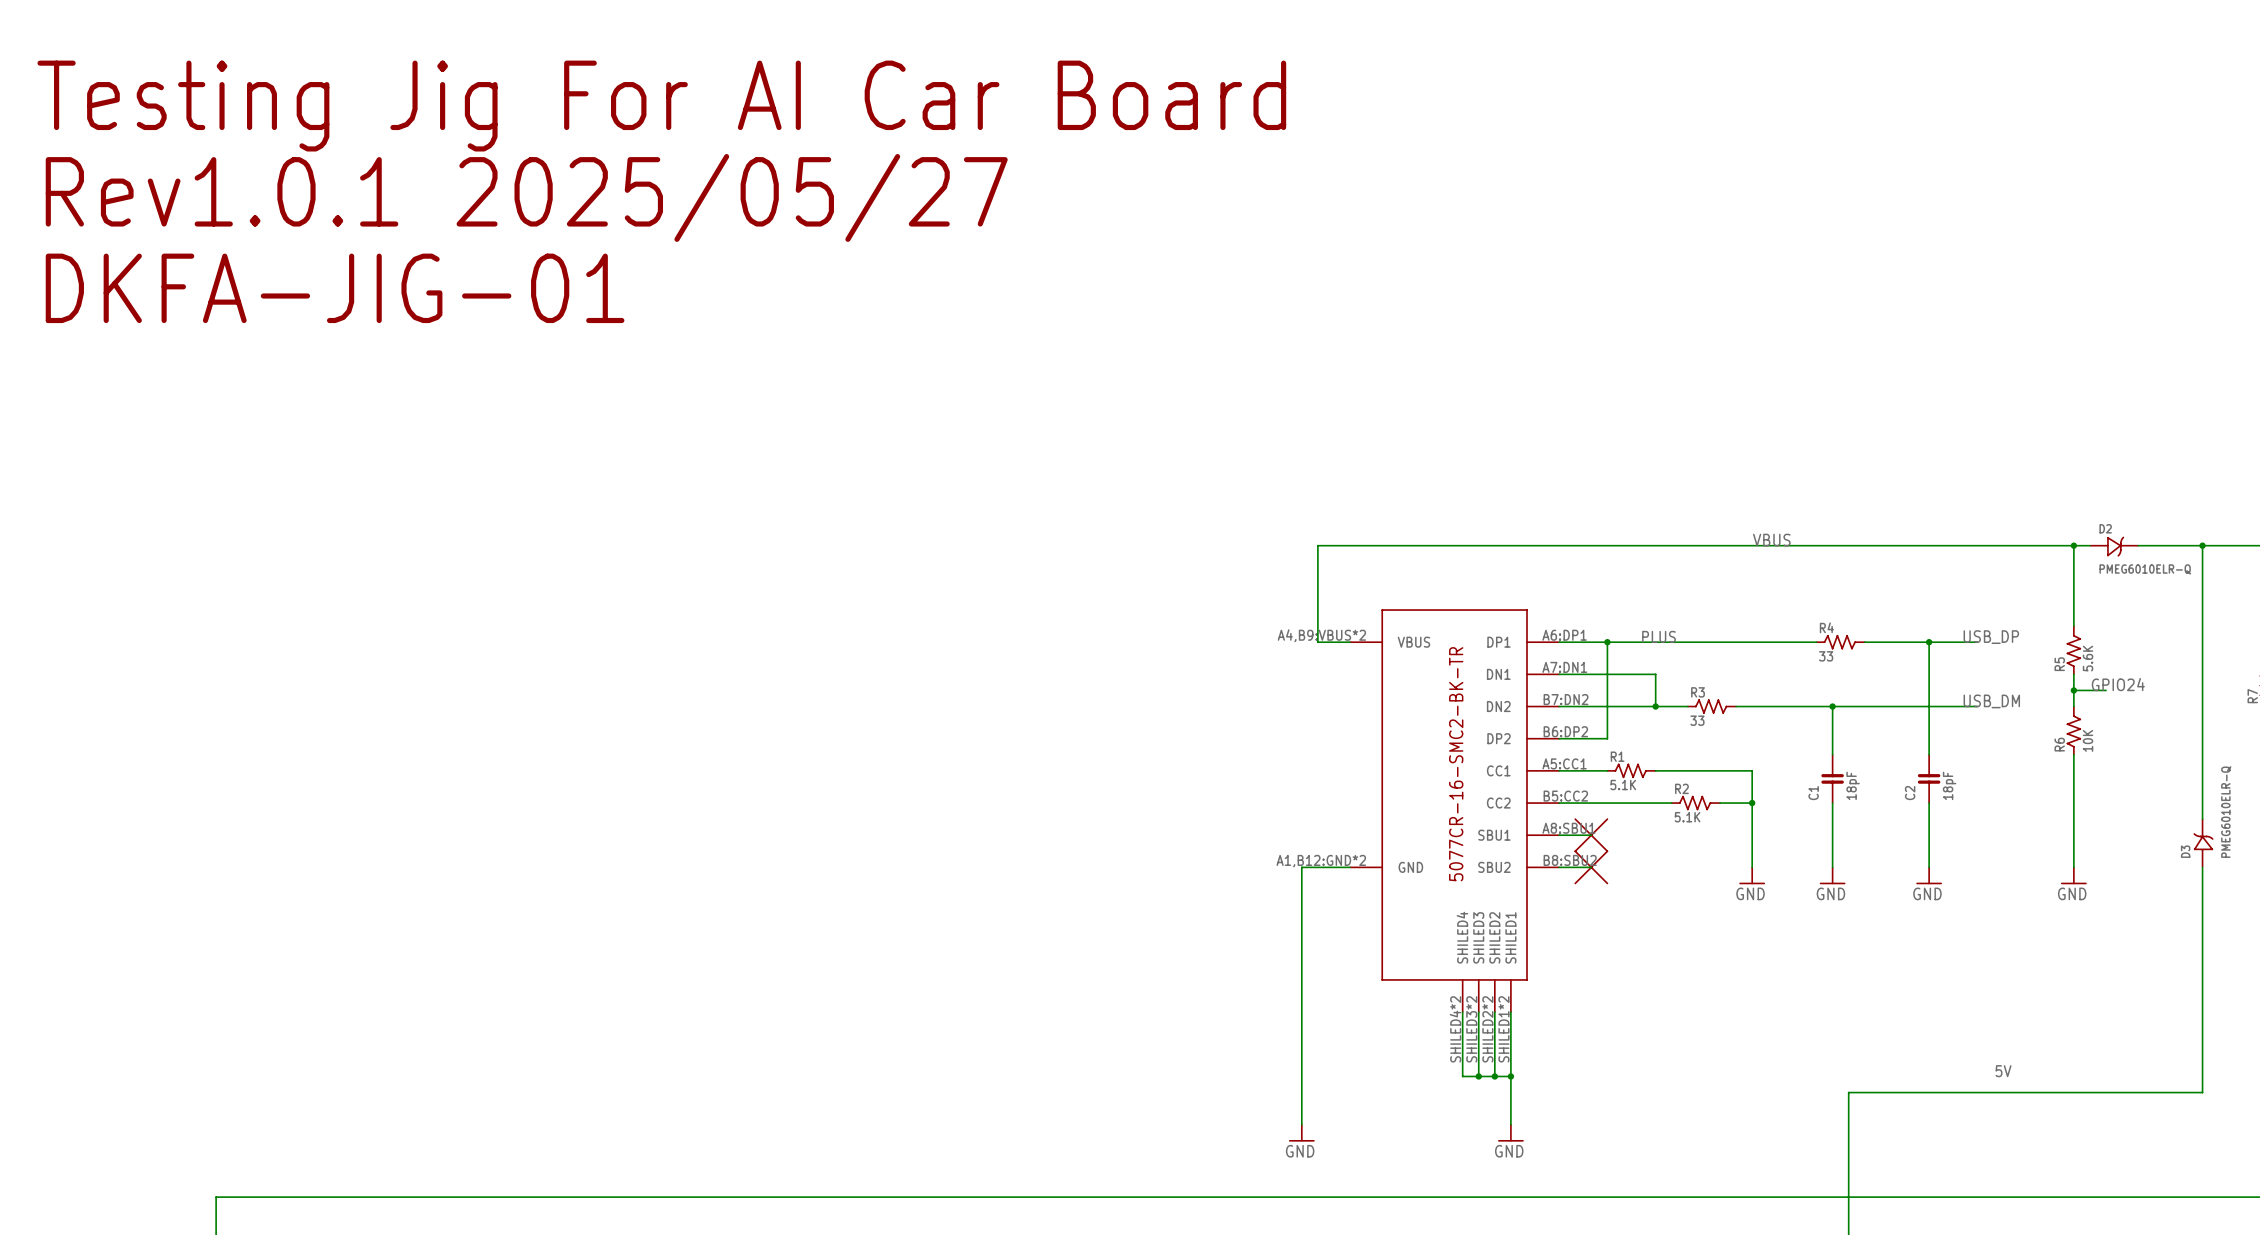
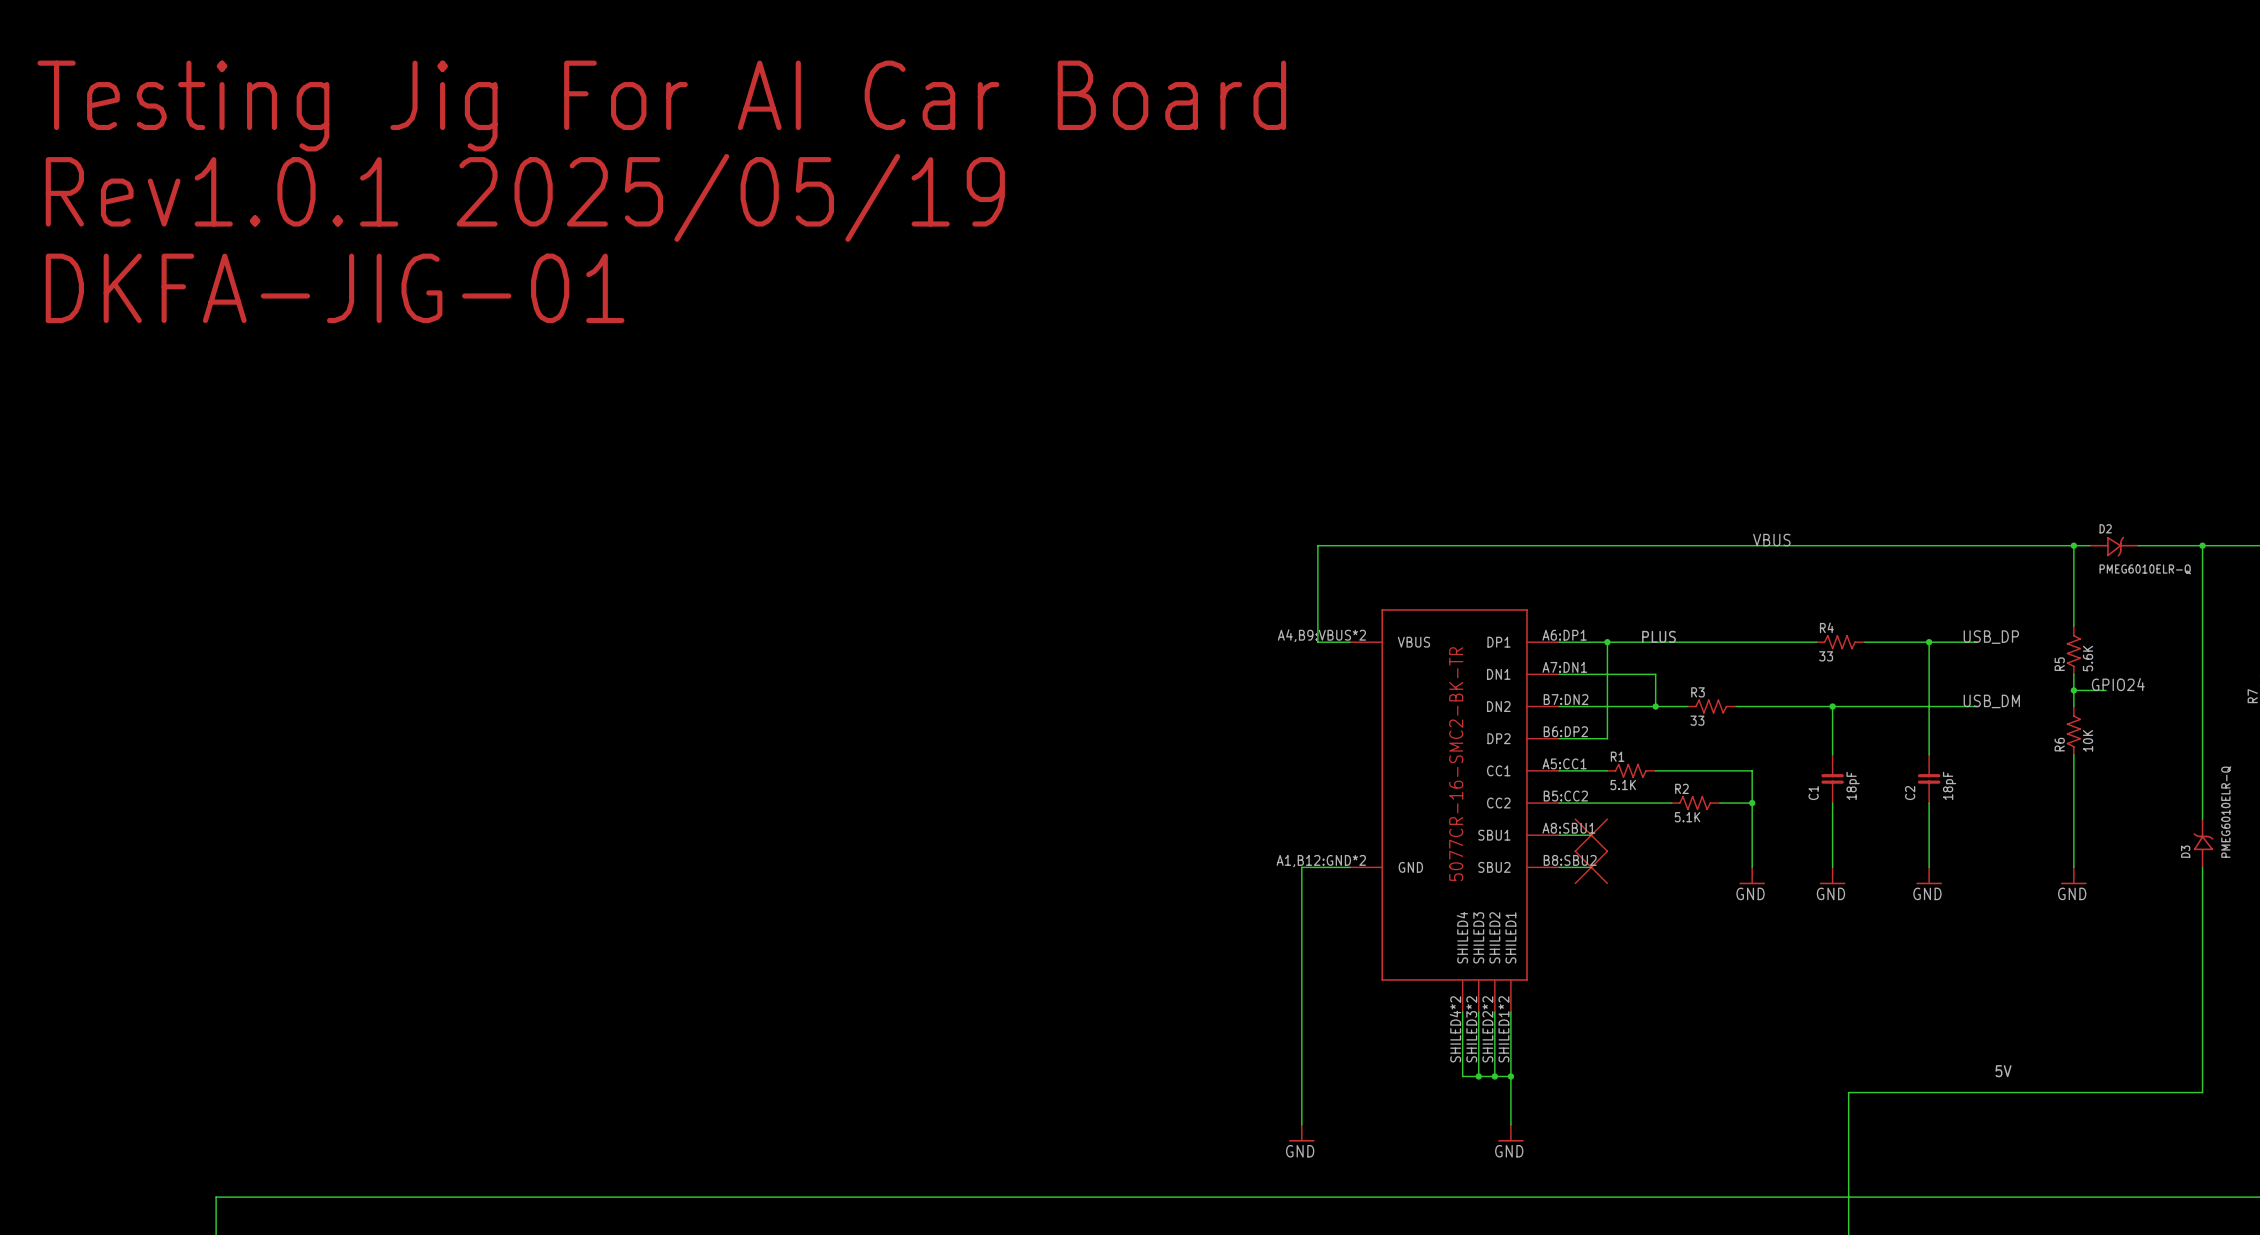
text: Rev1.0.1 2025/05/27 (526, 197) -> Rev1.0.1 2025/05/19 (525, 197)

